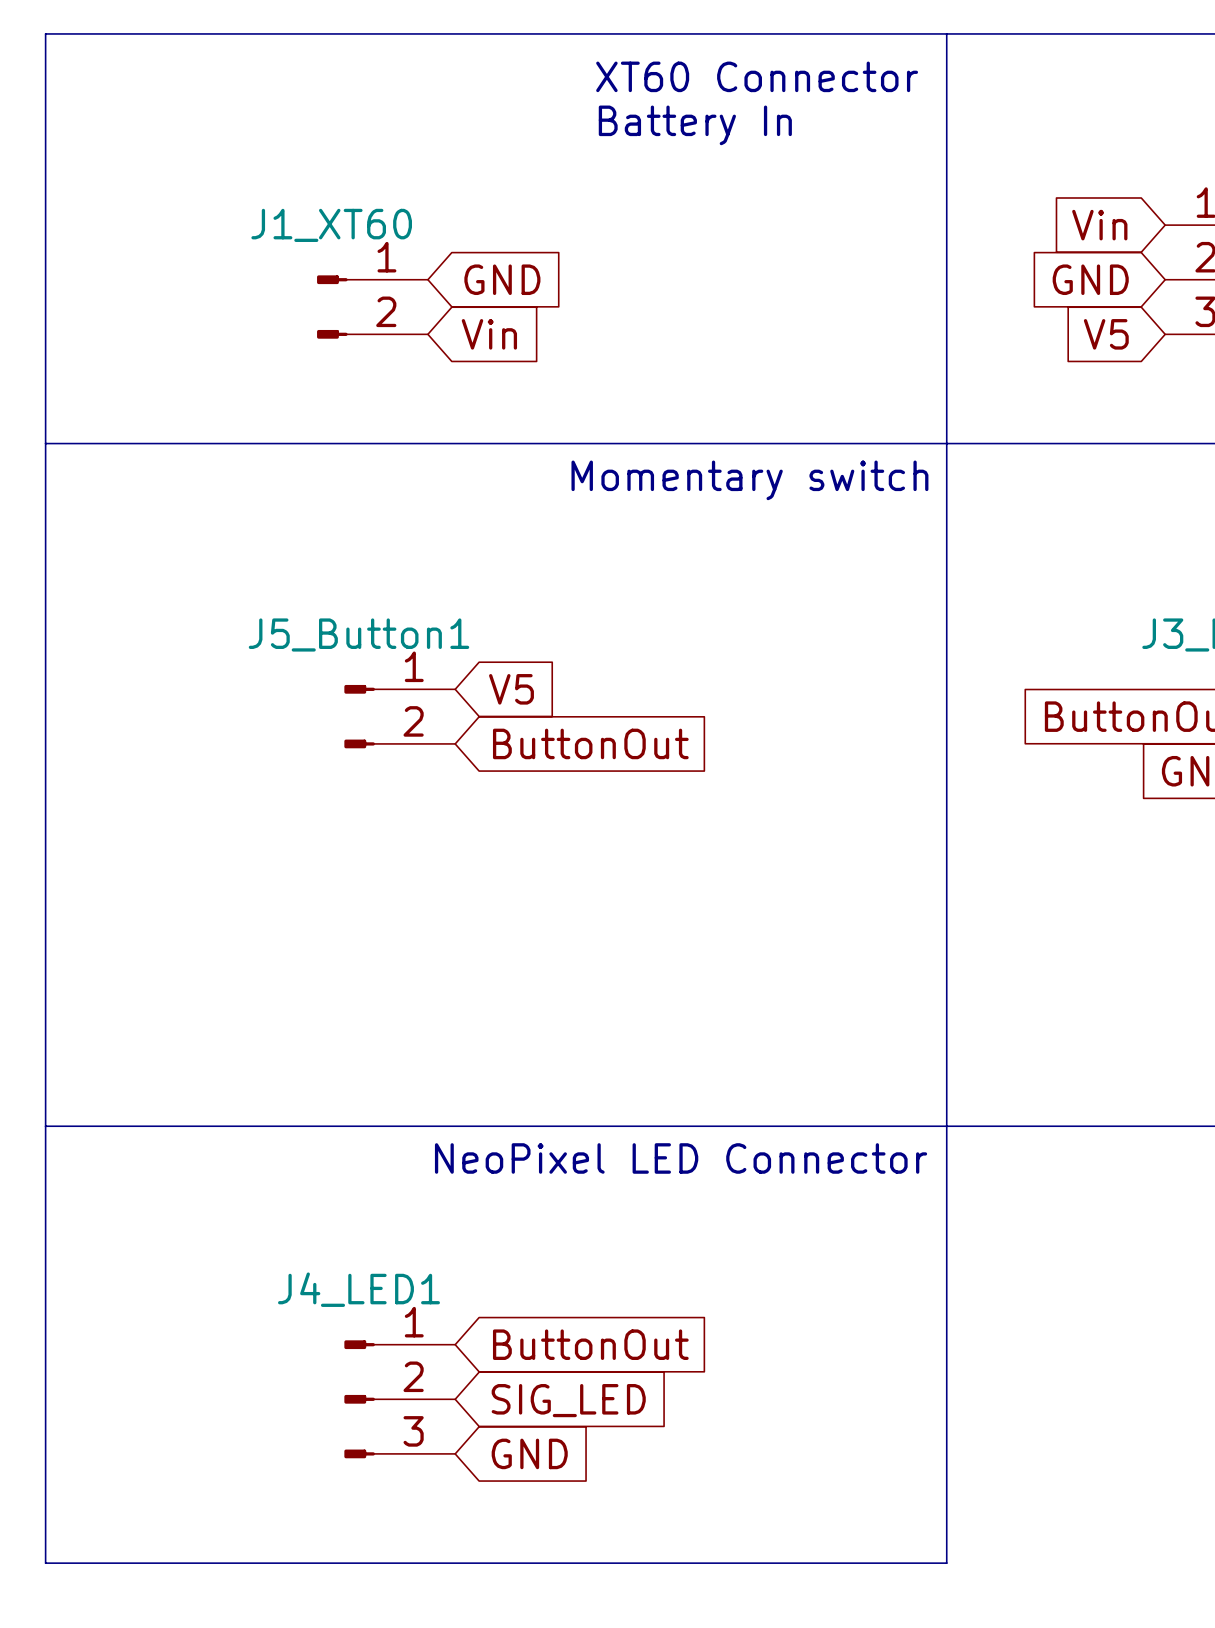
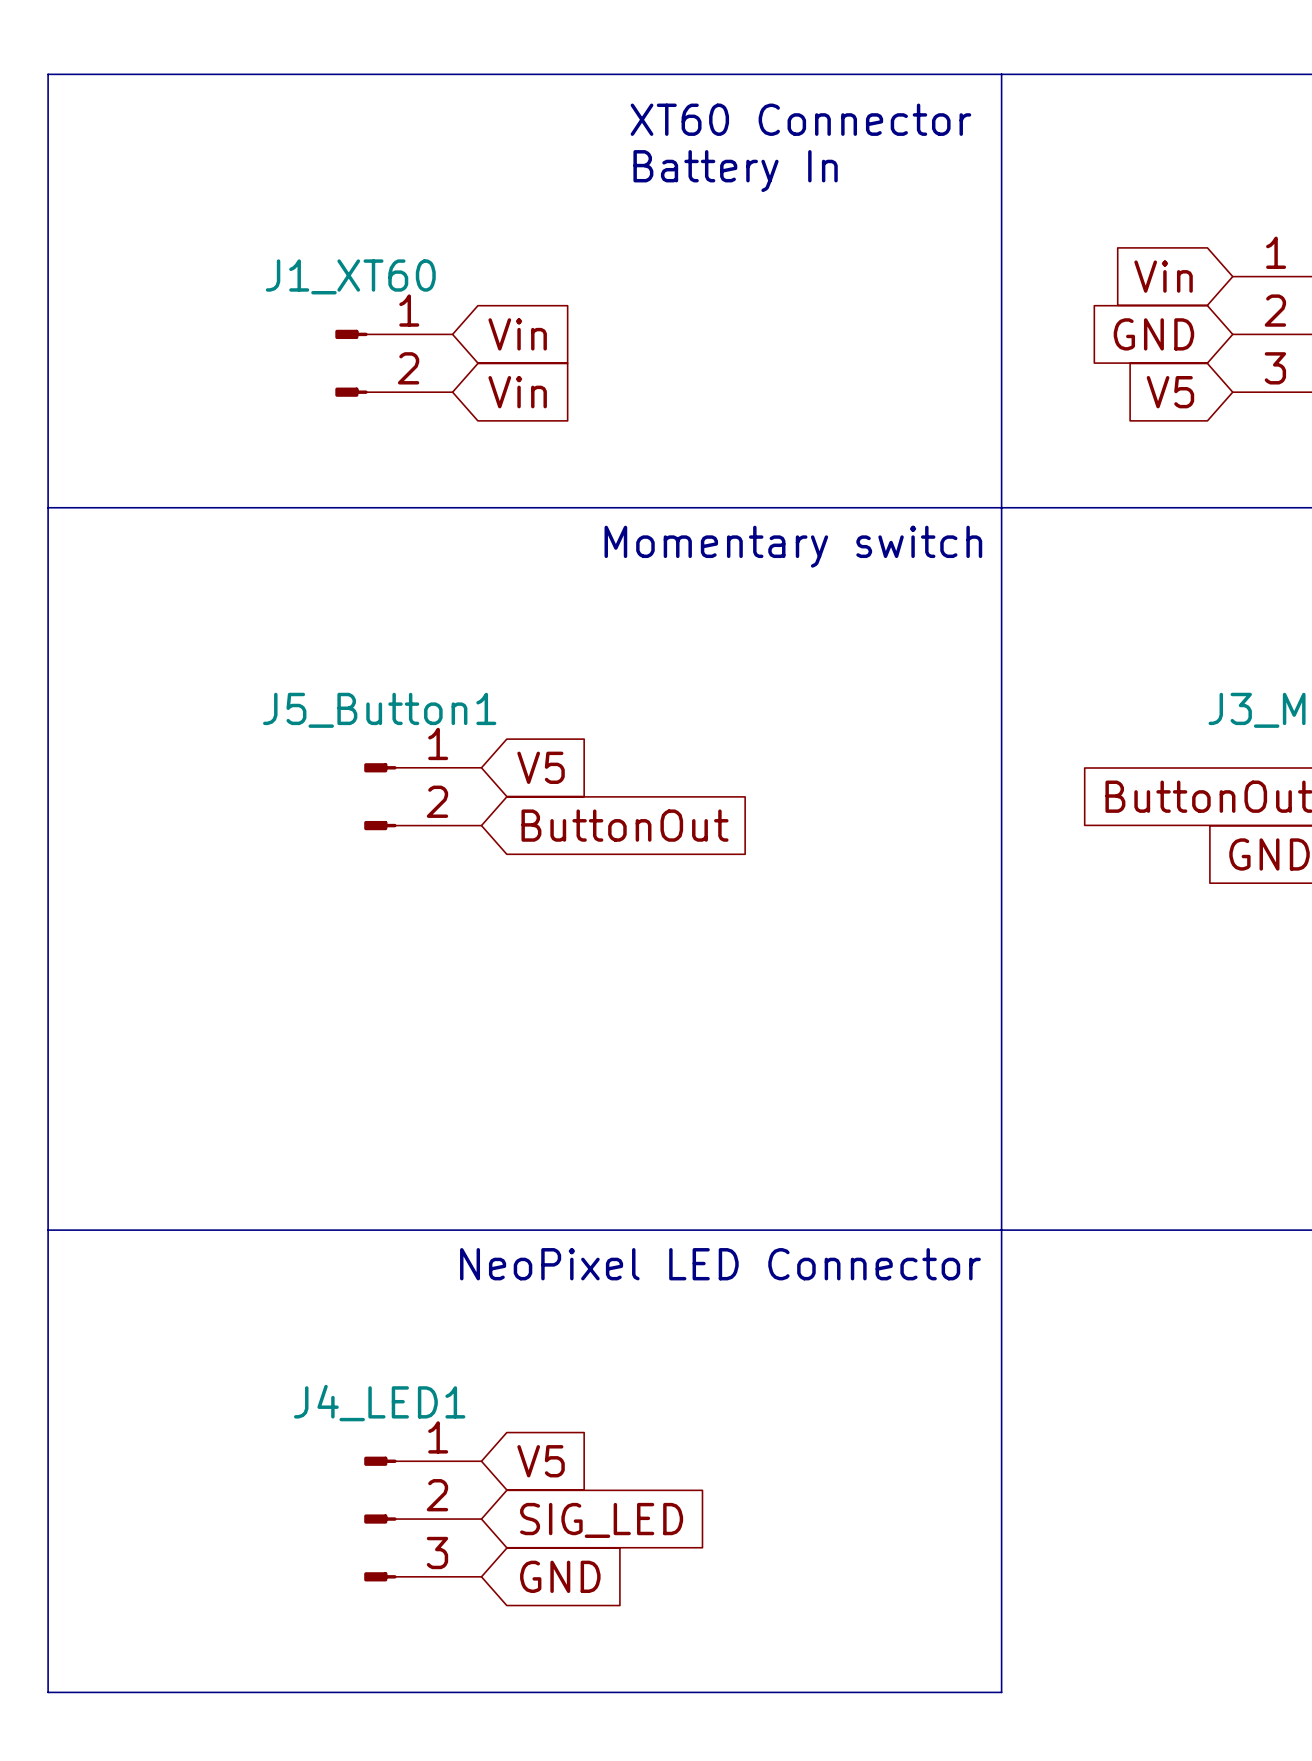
global label: GND (502, 279) -> Vin (517, 334)
global label: ButtonOut (590, 1344) -> V5 (541, 1461)

